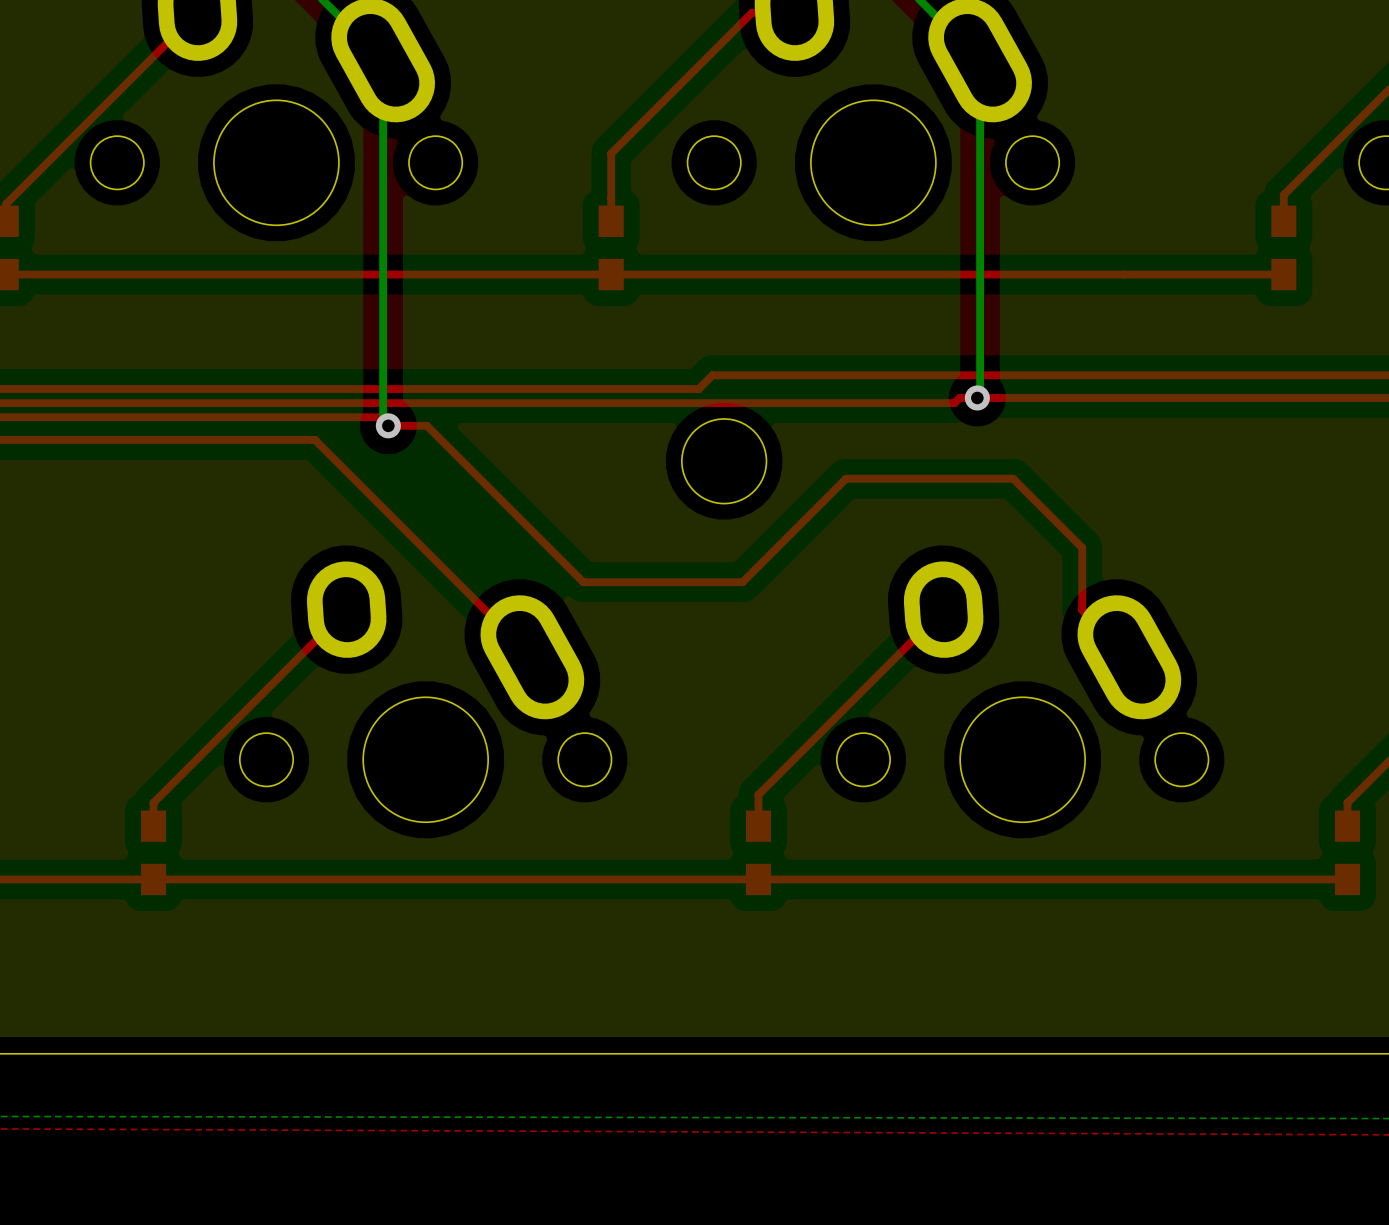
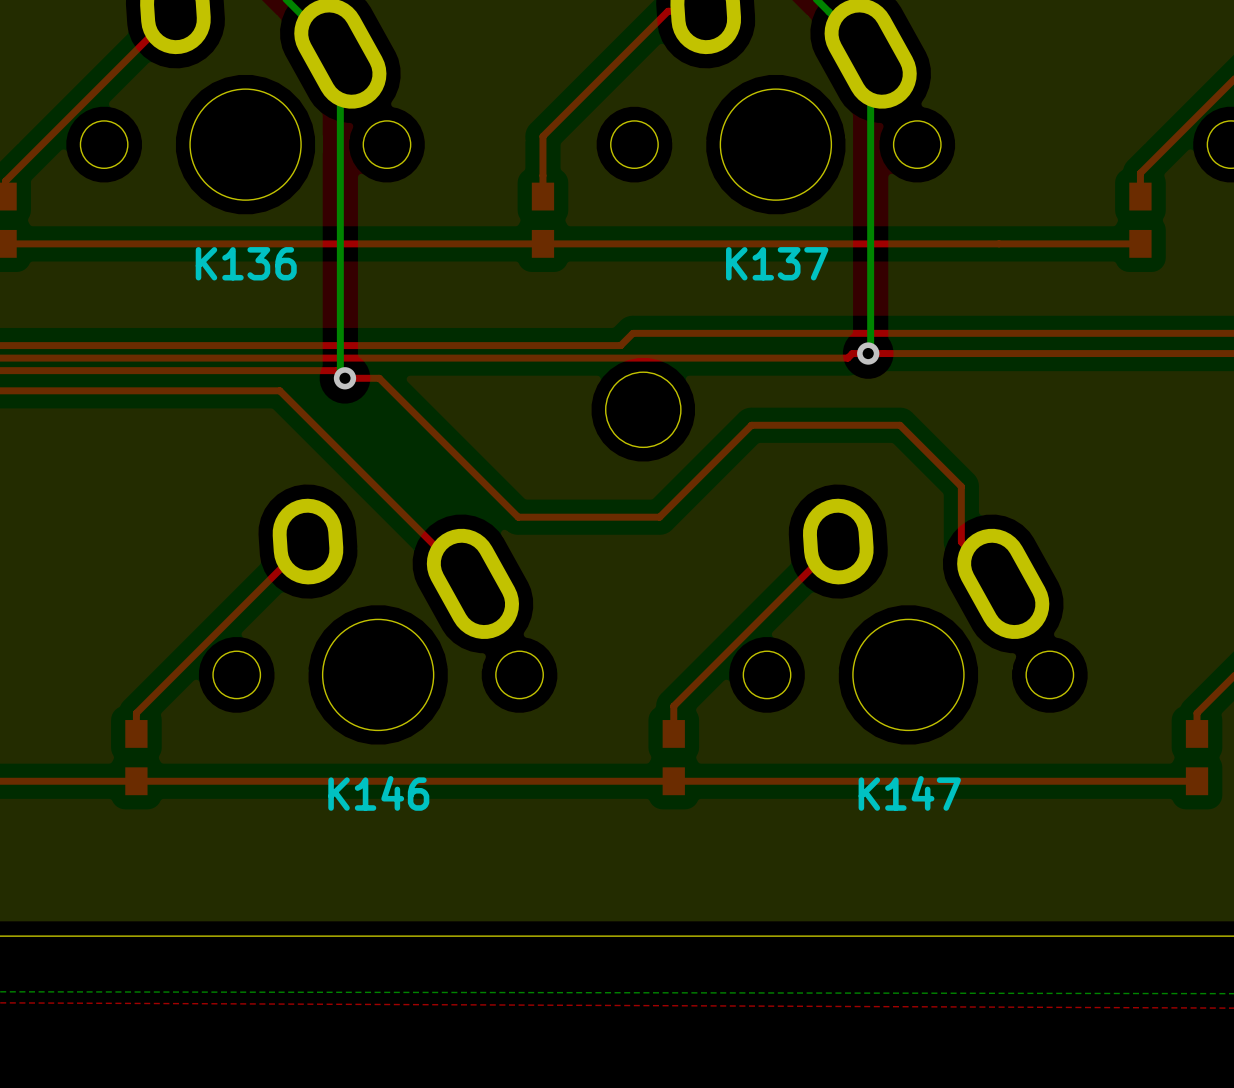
K136 name: none -> K136 (246, 263)
K137 name: none -> K137 (777, 263)
K146 name: none -> K146 (378, 793)
K147 name: none -> K147 (909, 793)

